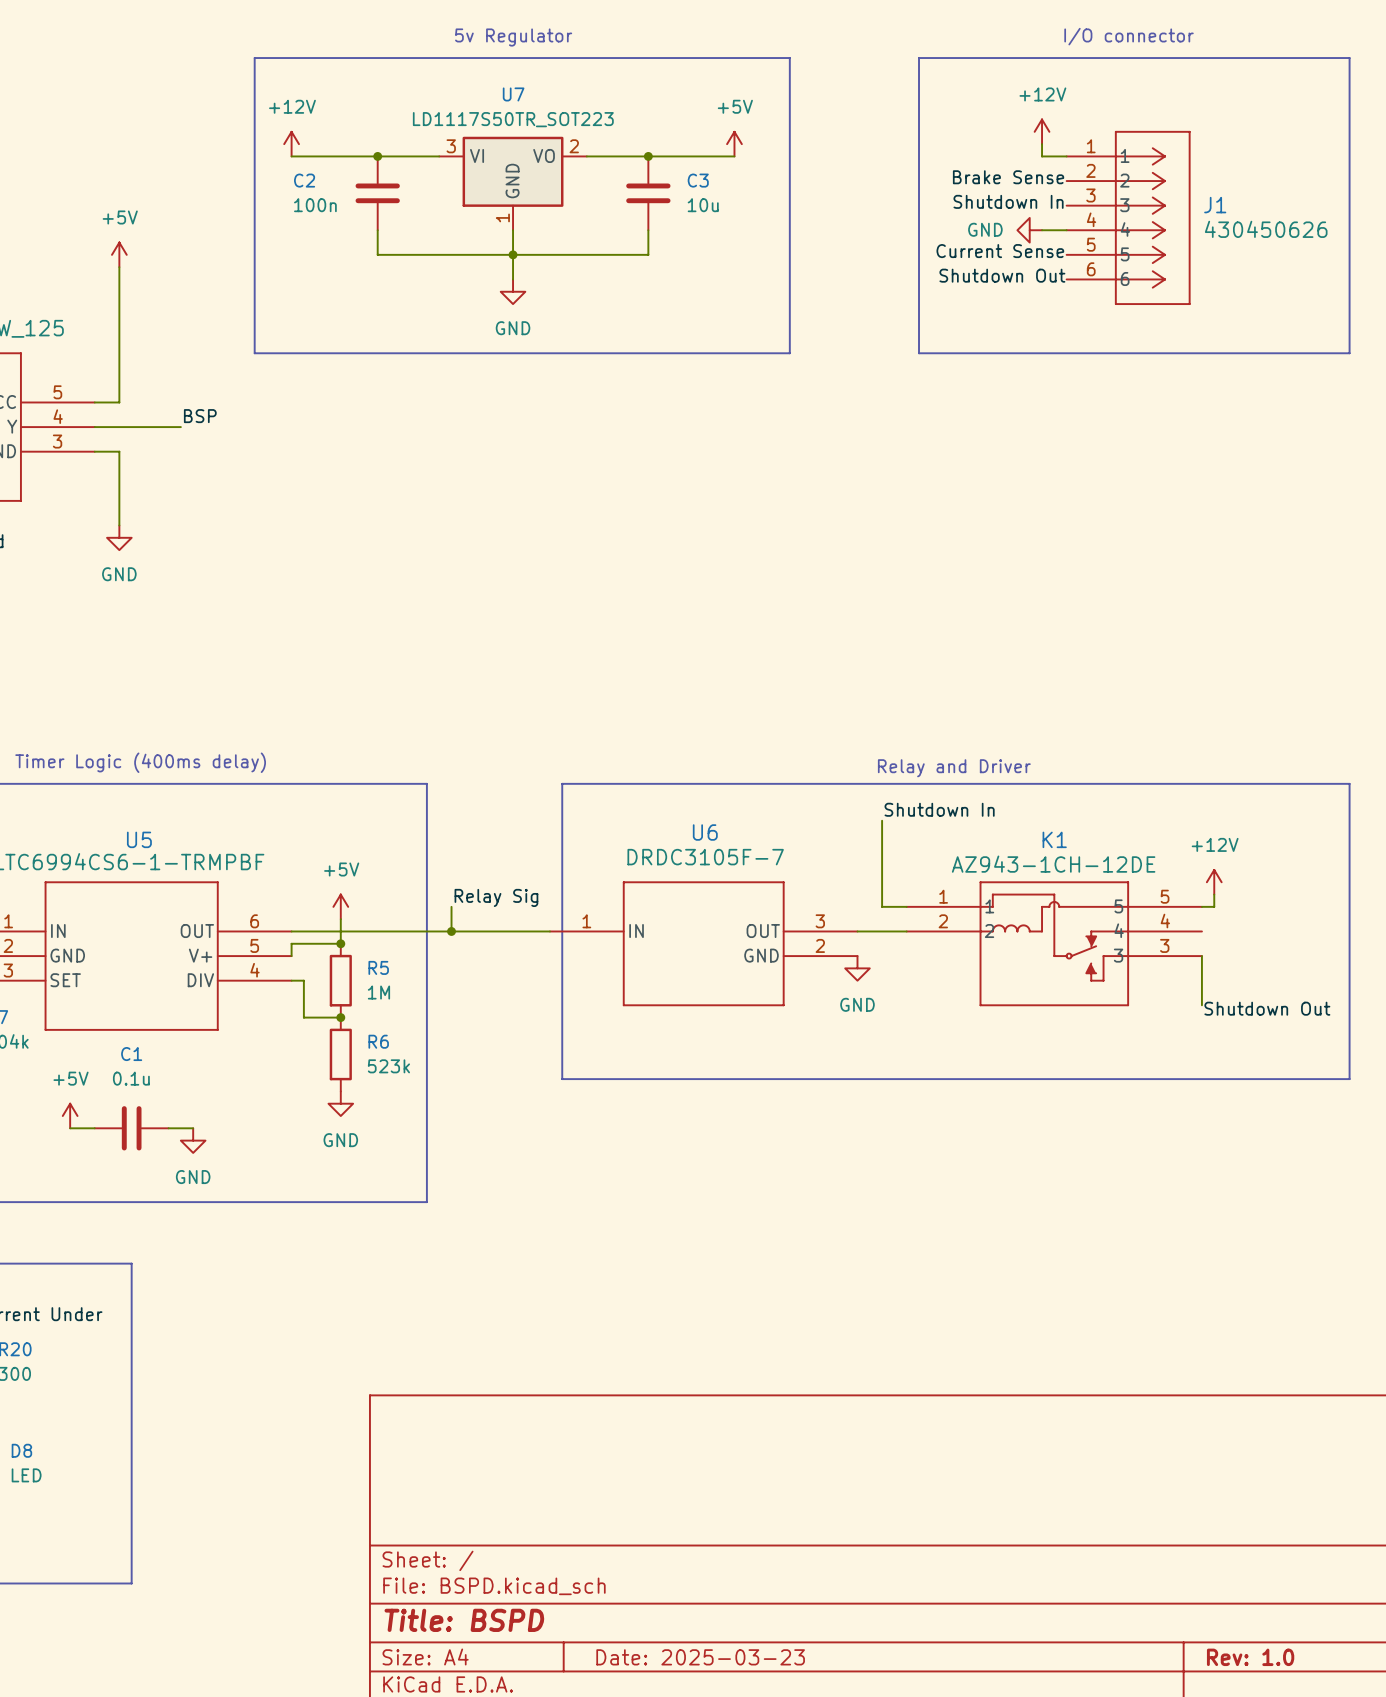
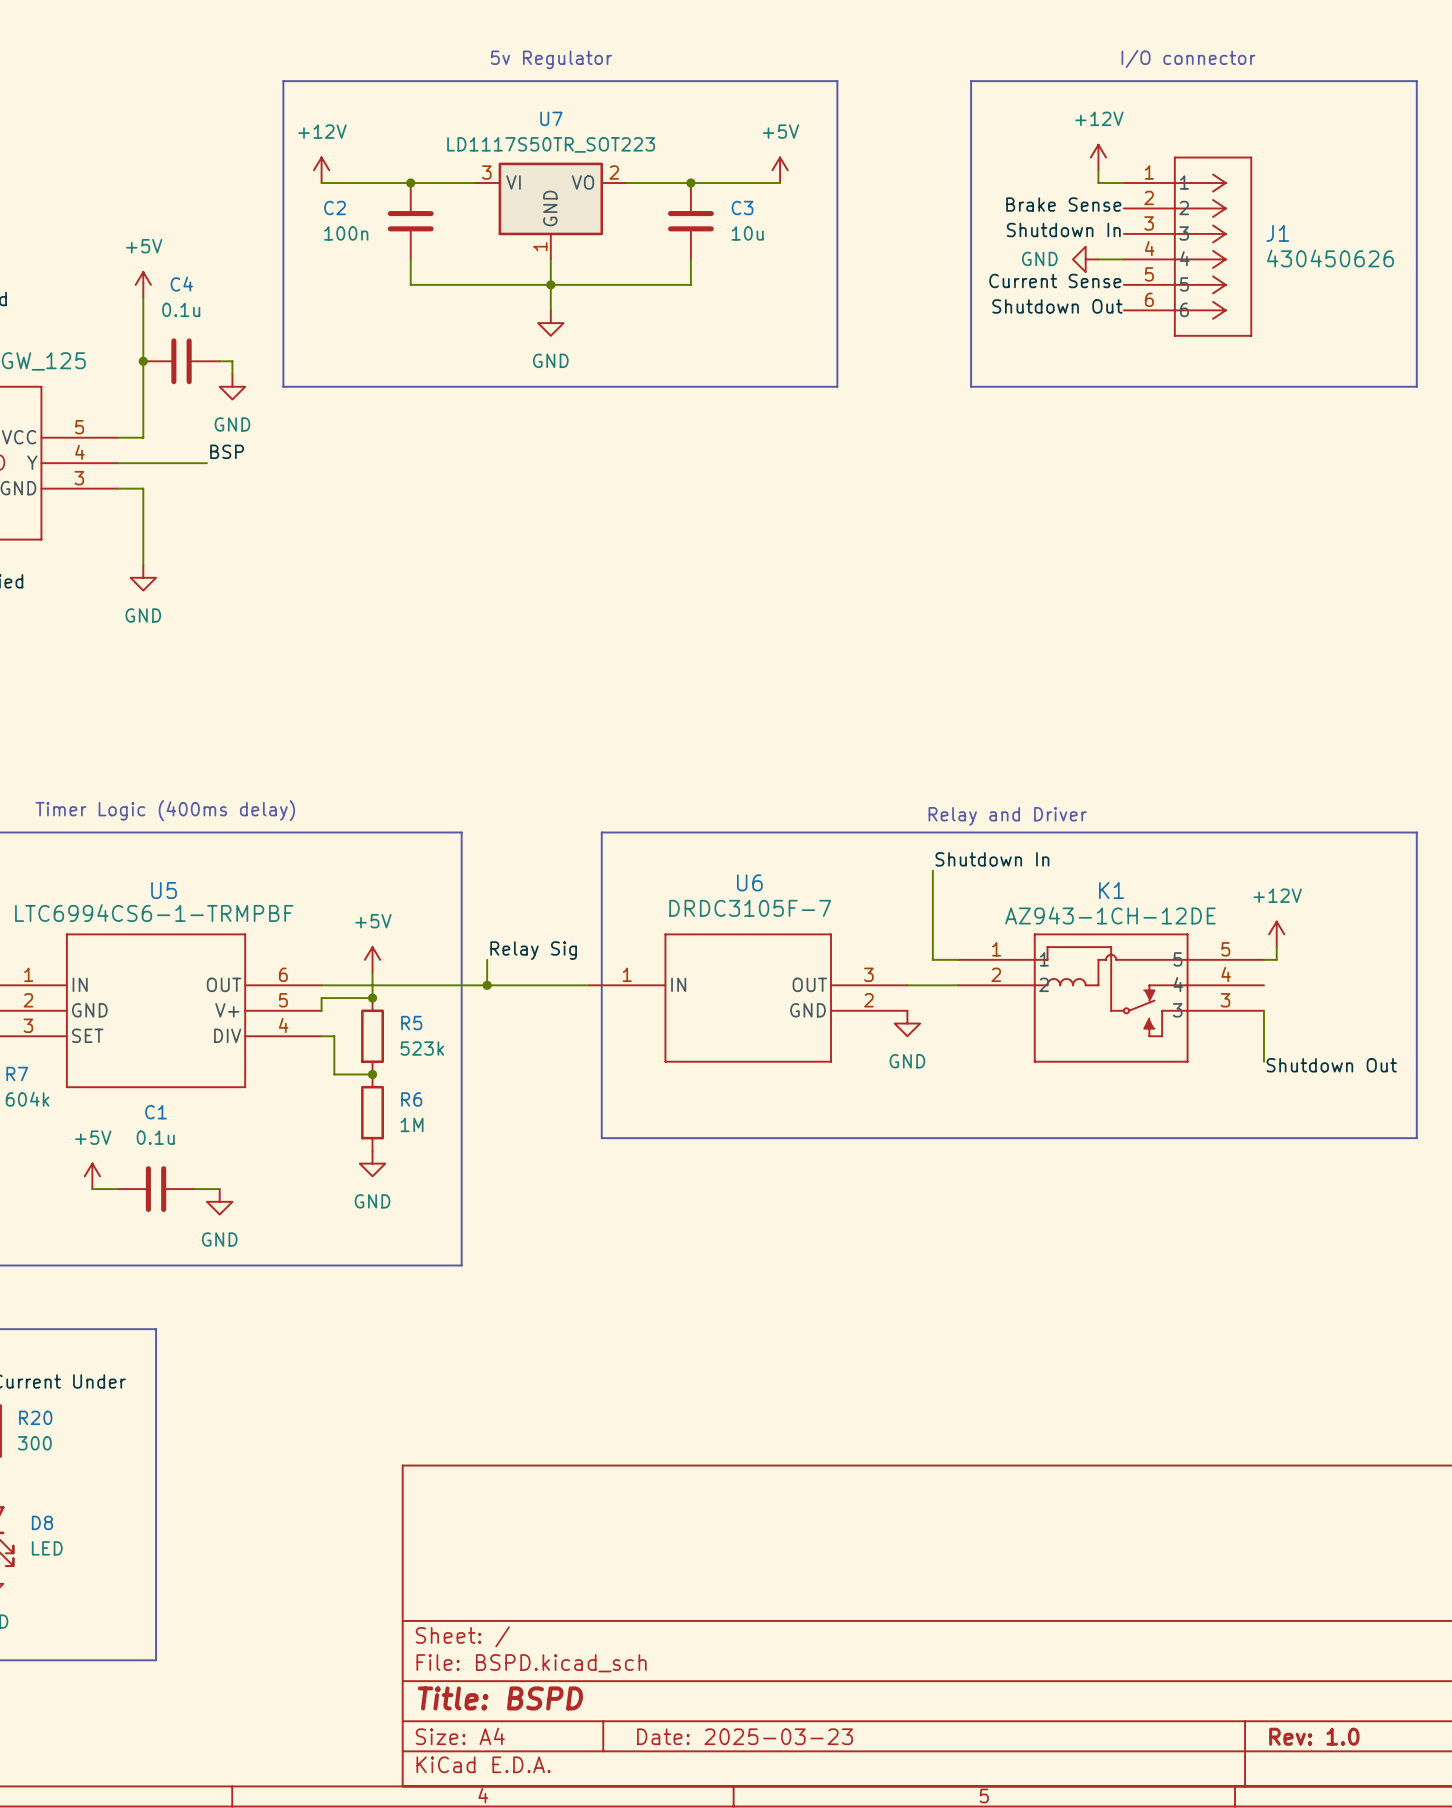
junction: none -> (143, 361)
C4: none -> 0.1u (181, 361)
wire: none -> (219, 361) (232, 361) (232, 374)
power symbol: none -> GND (232, 386)
R5 value: 1M (378, 992) -> 523k (422, 1048)
R6 value: 523k (388, 1066) -> 1M (412, 1124)

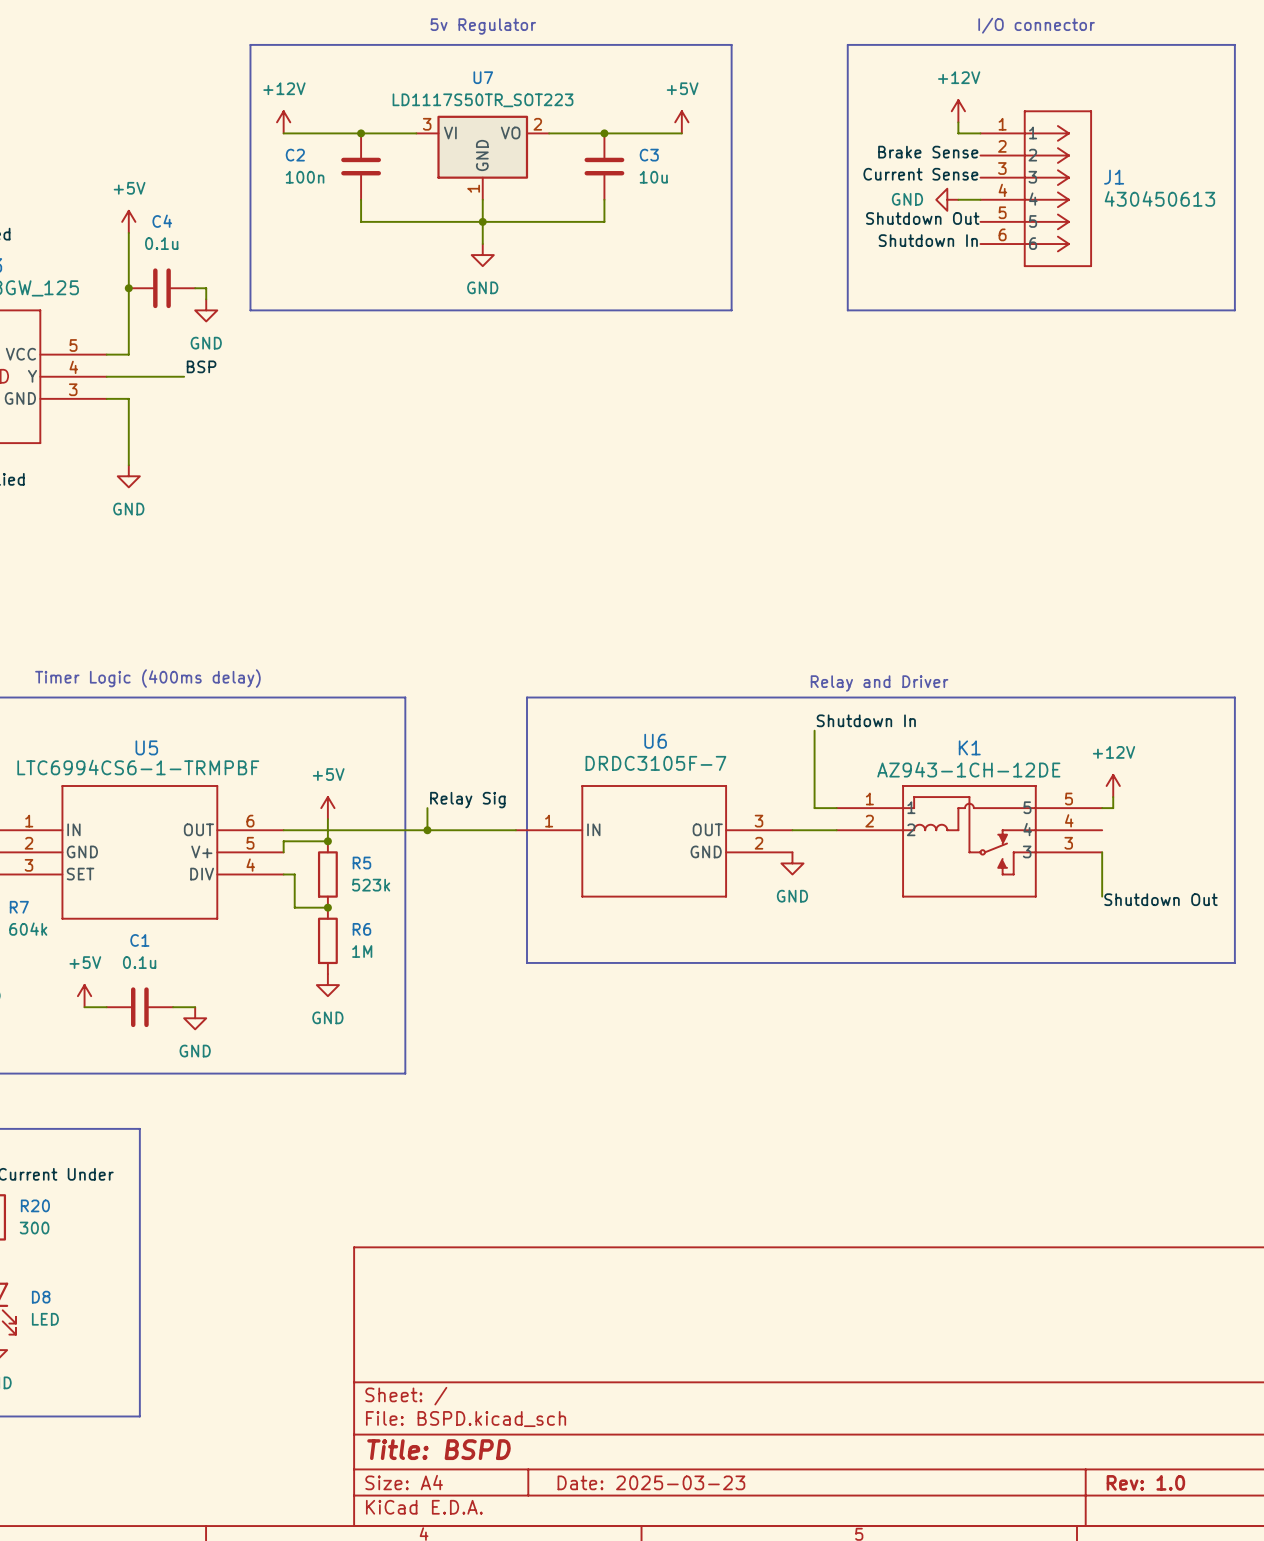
label: Shutdown In (1063, 230) -> Current Sense (920, 174)
J1 value: 430450626 (1330, 258) -> 430450613 (1159, 198)
label: Current Sense (1055, 280) -> Shutdown Out (922, 218)
label: Shutdown Out (1057, 306) -> Shutdown In (928, 240)

